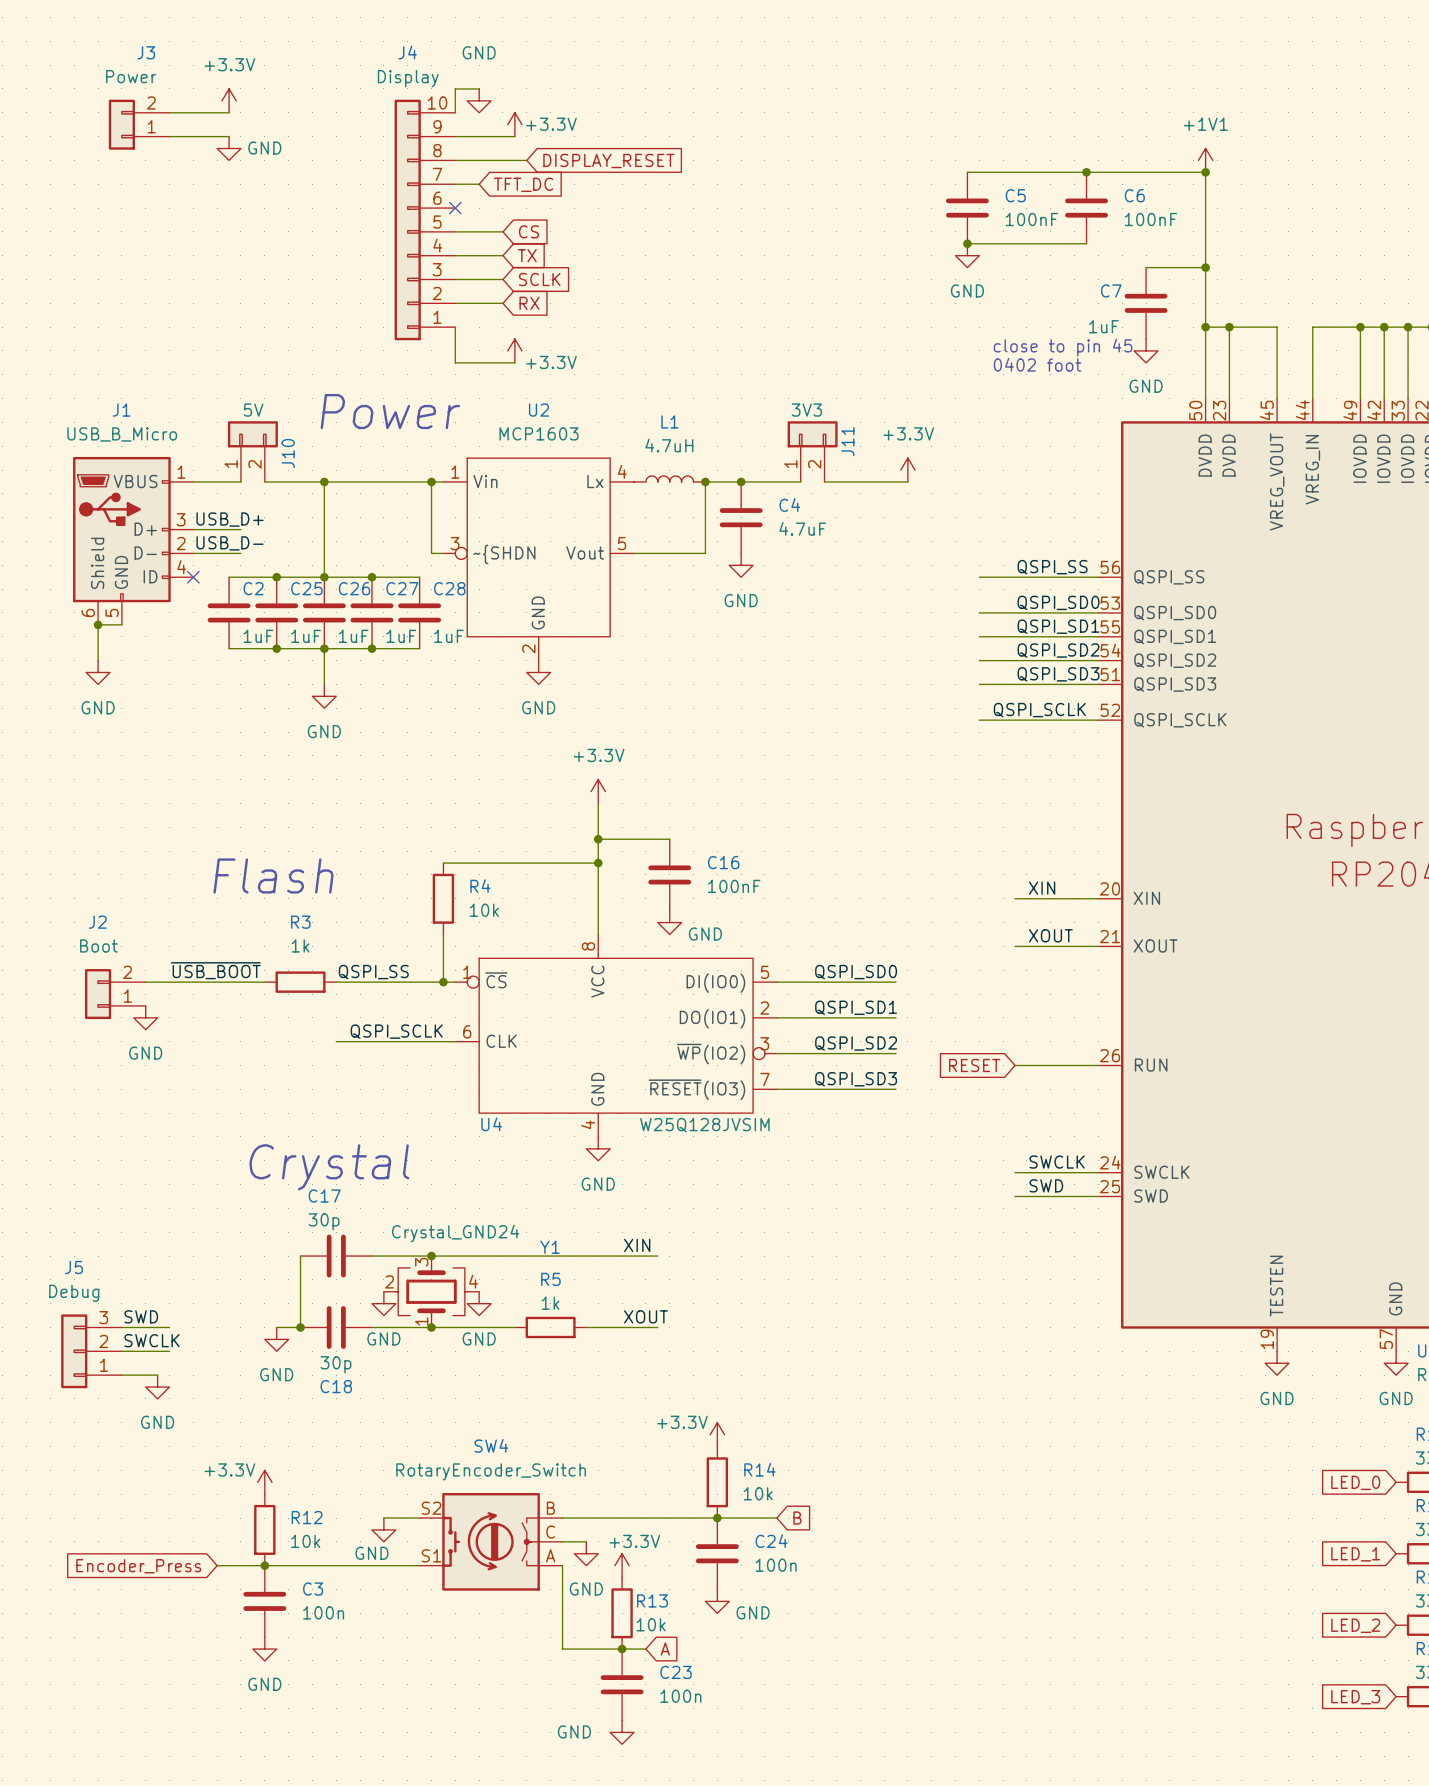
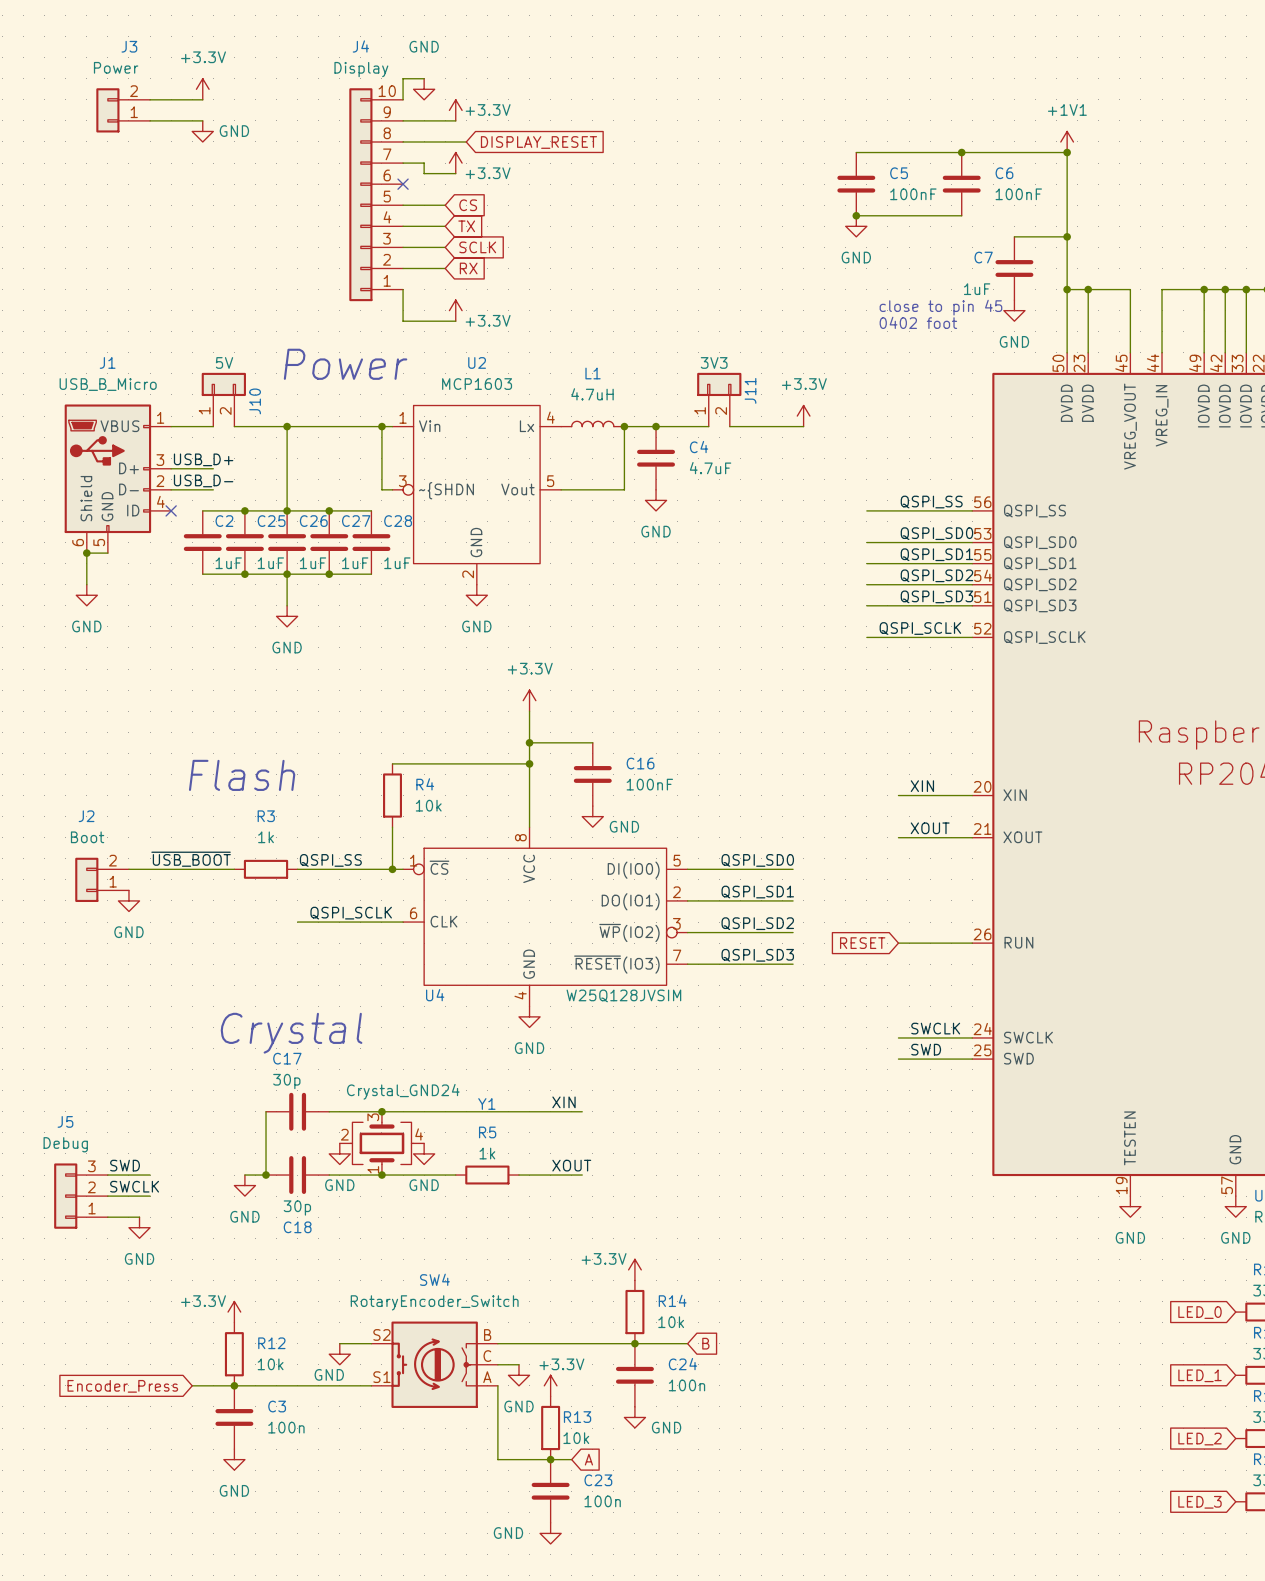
wire: none -> (424, 163) (424, 173) (455, 173)
power symbol: none -> +3.3V (455, 163)
global label: TFT_DC (523, 184) -> none

